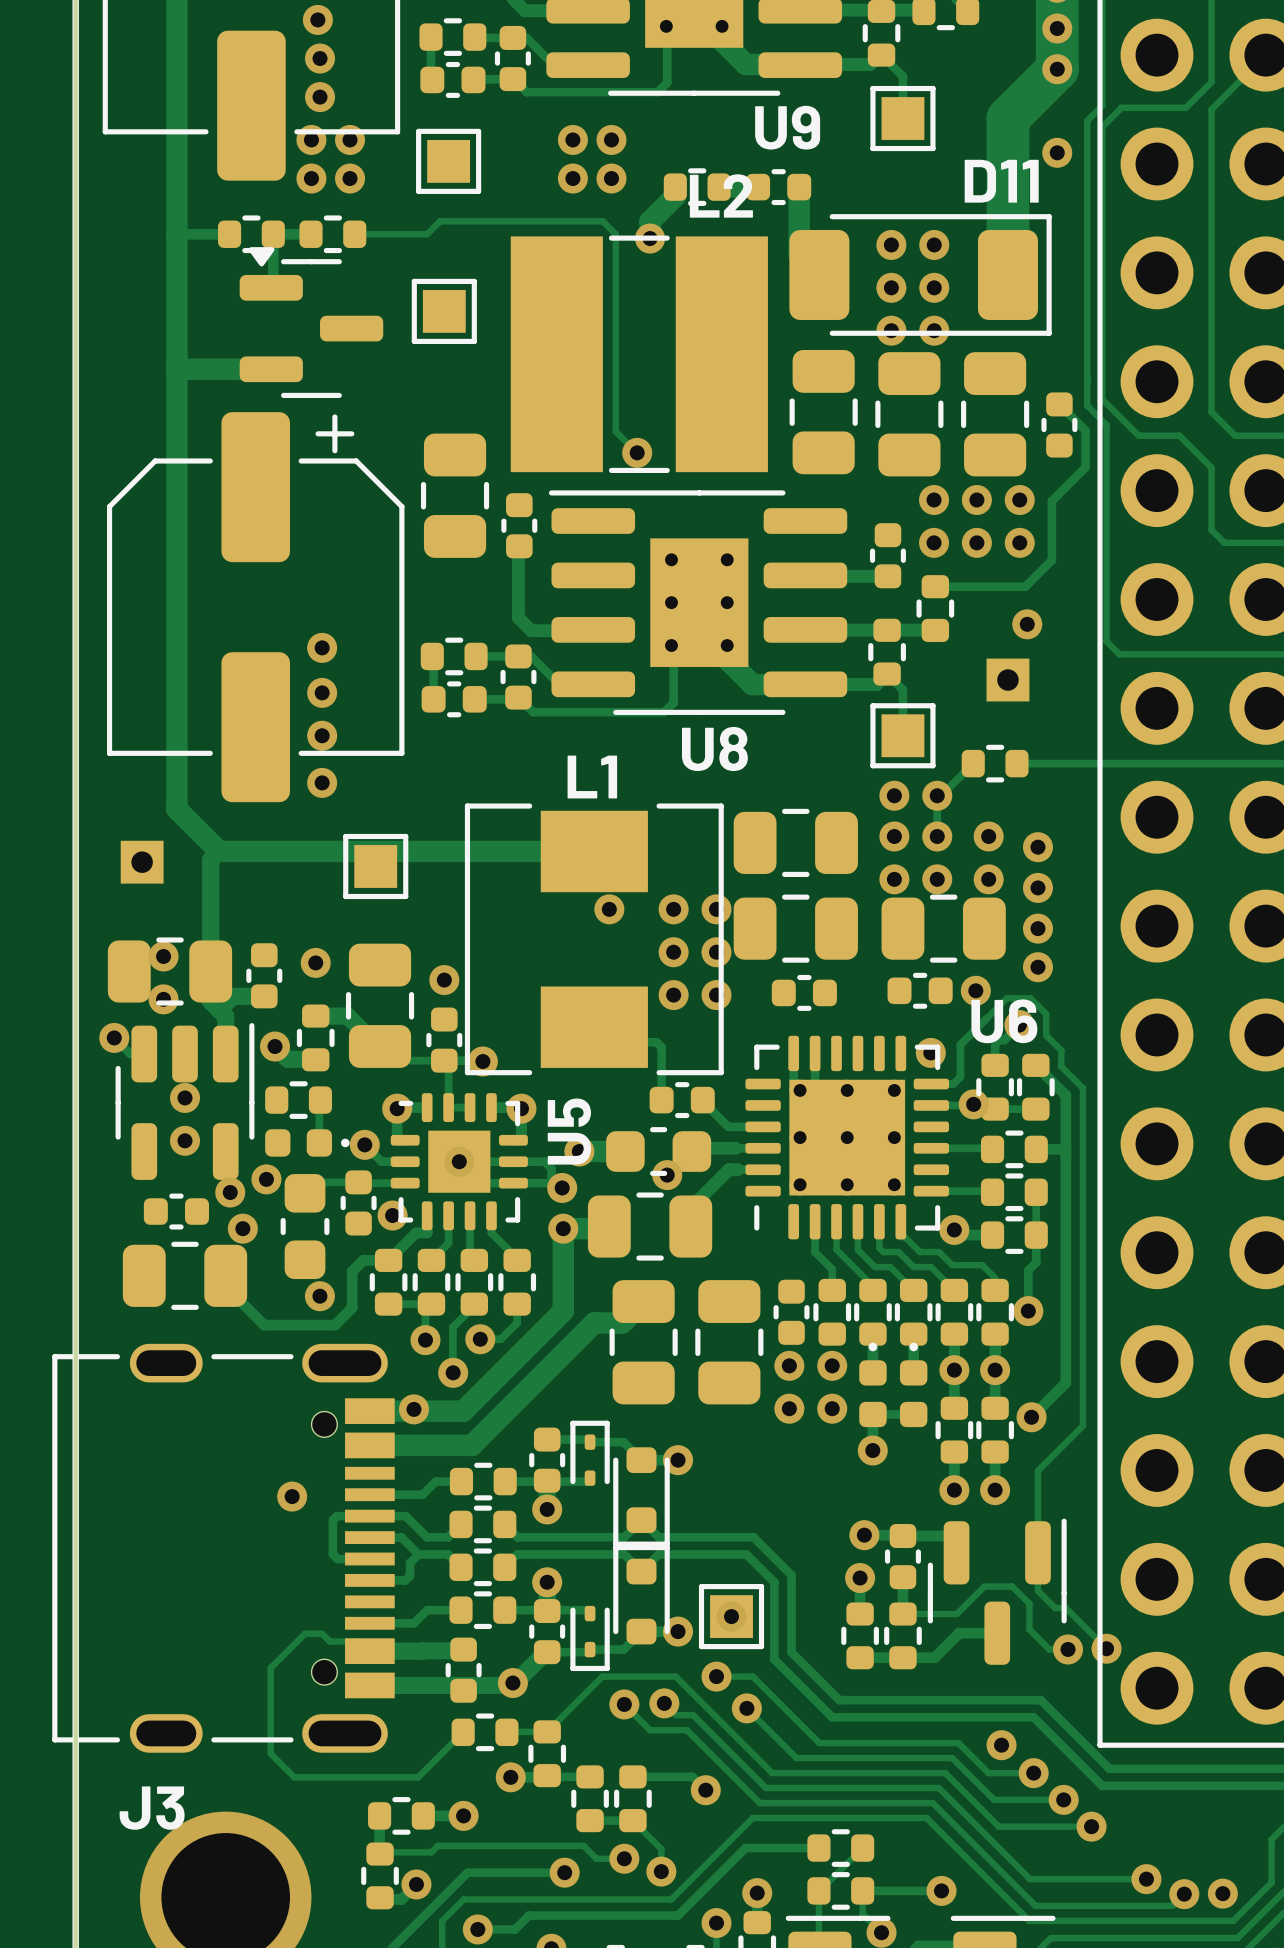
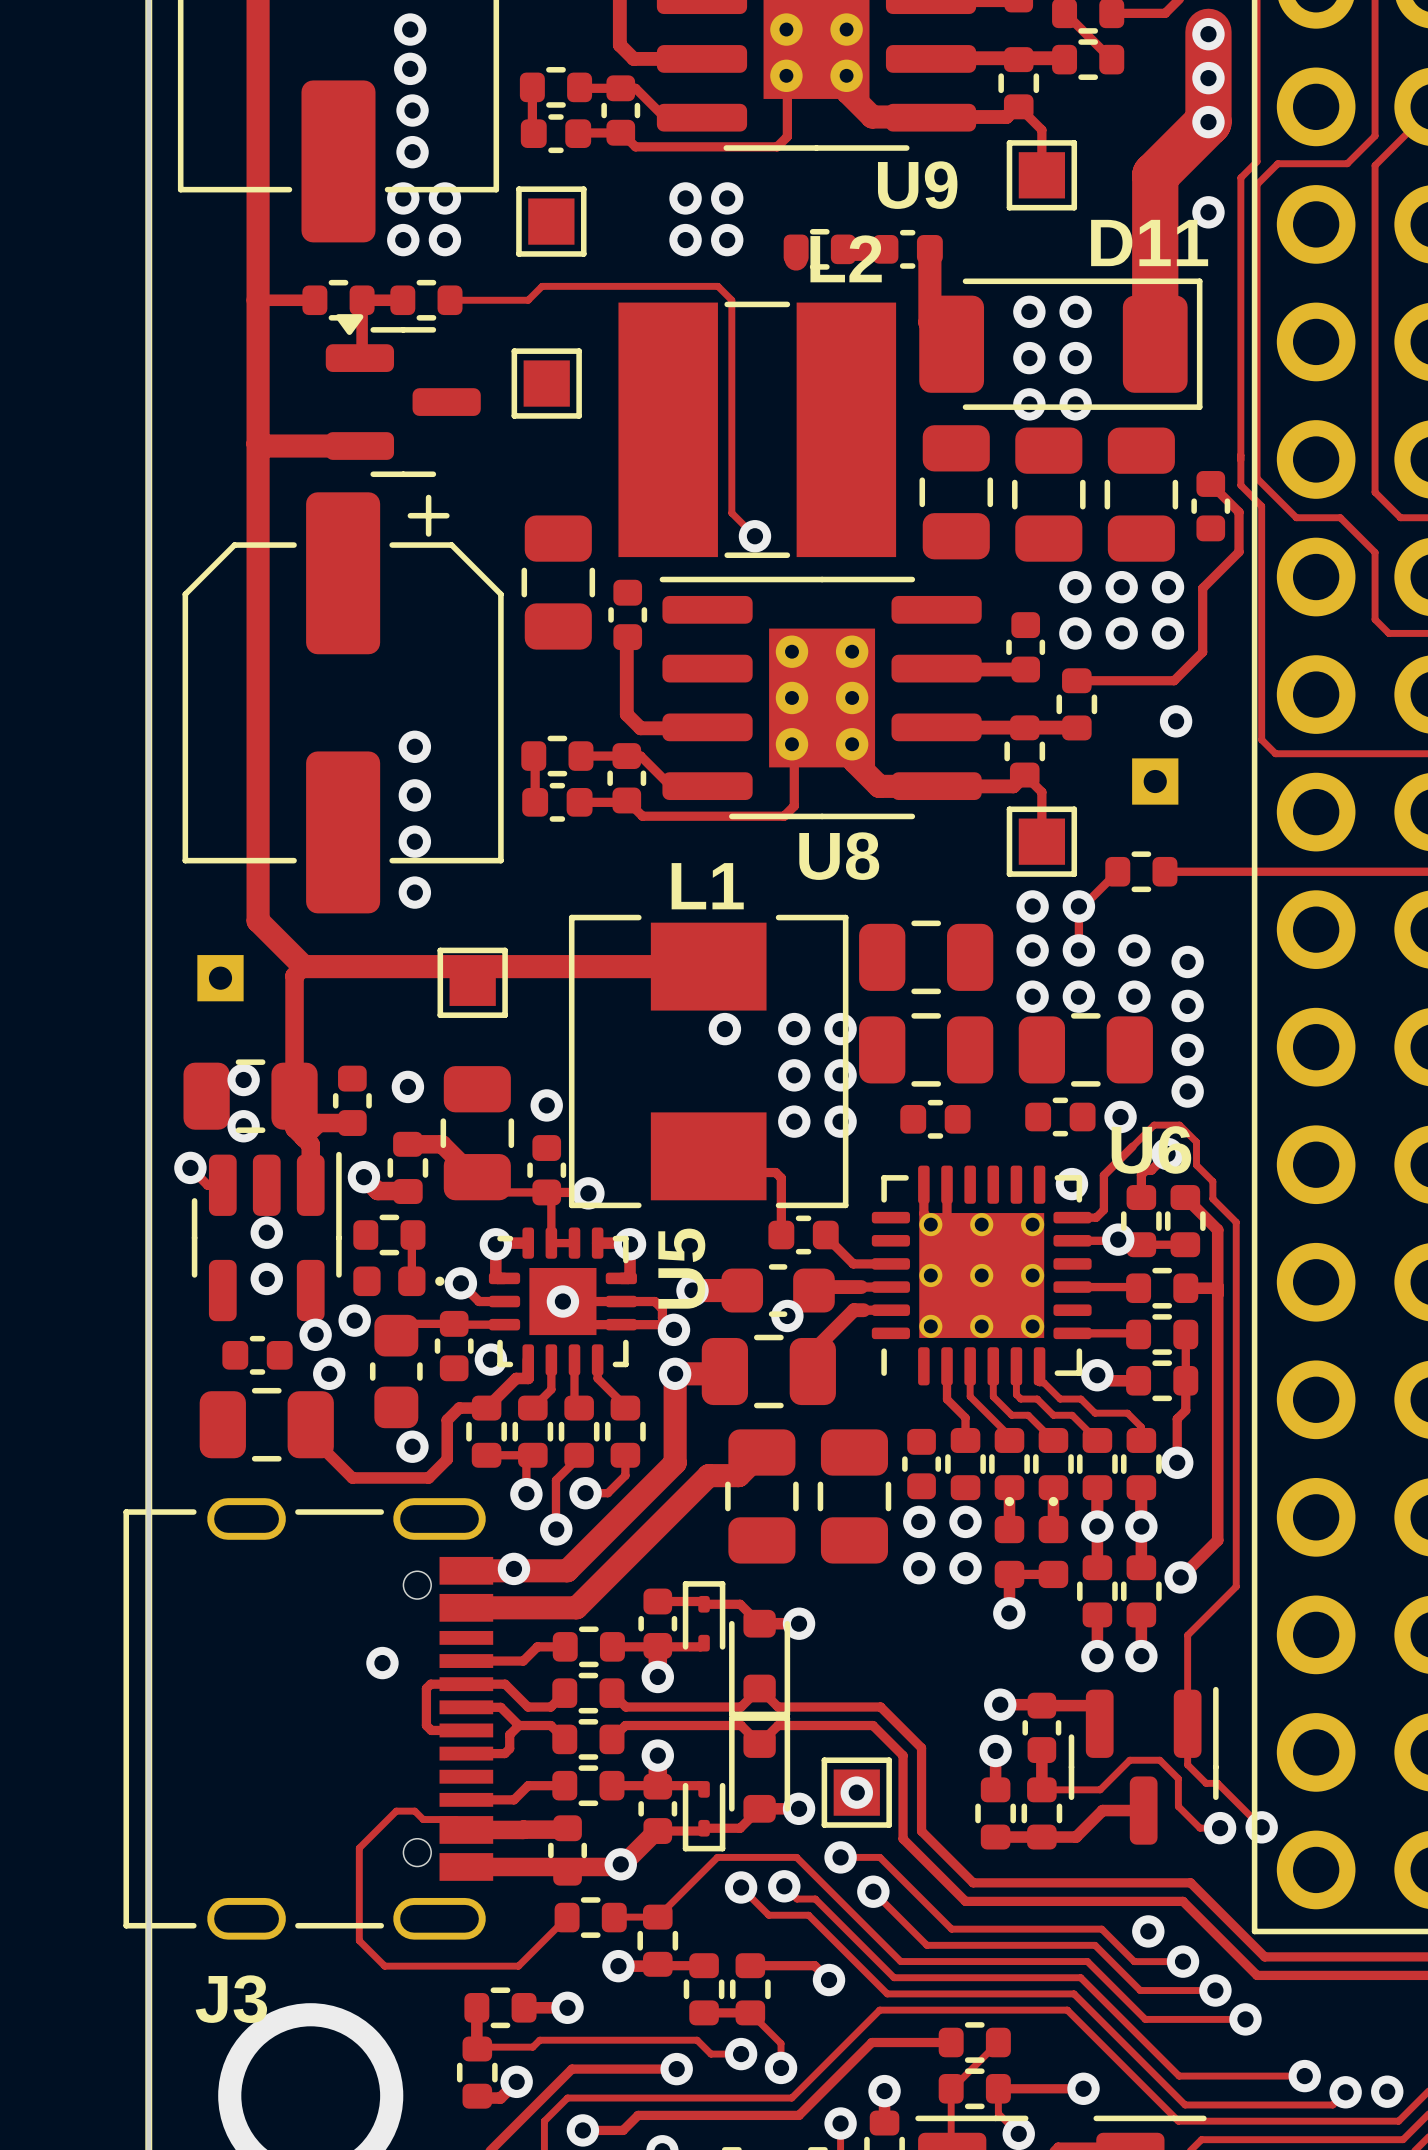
track: (675, 196) (650, 221) (650, 238) -> none
via: (650, 238) -> none

